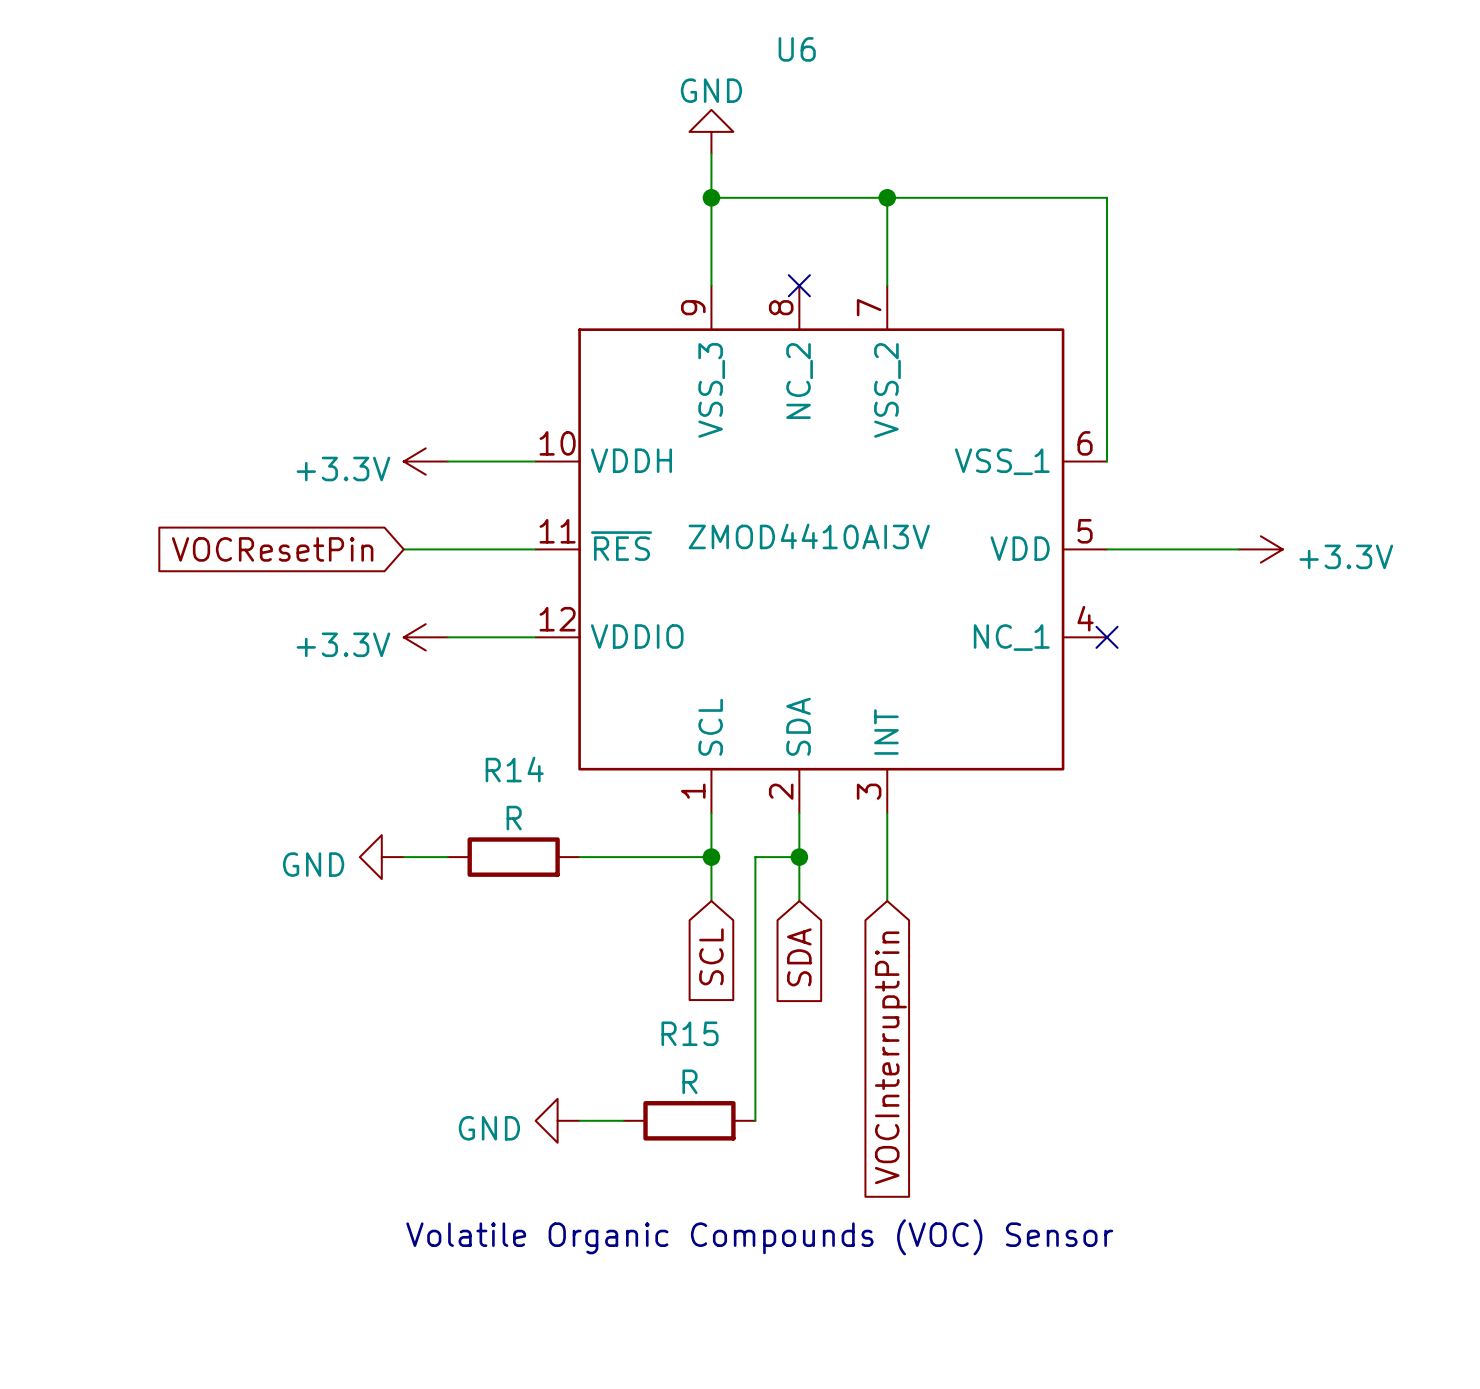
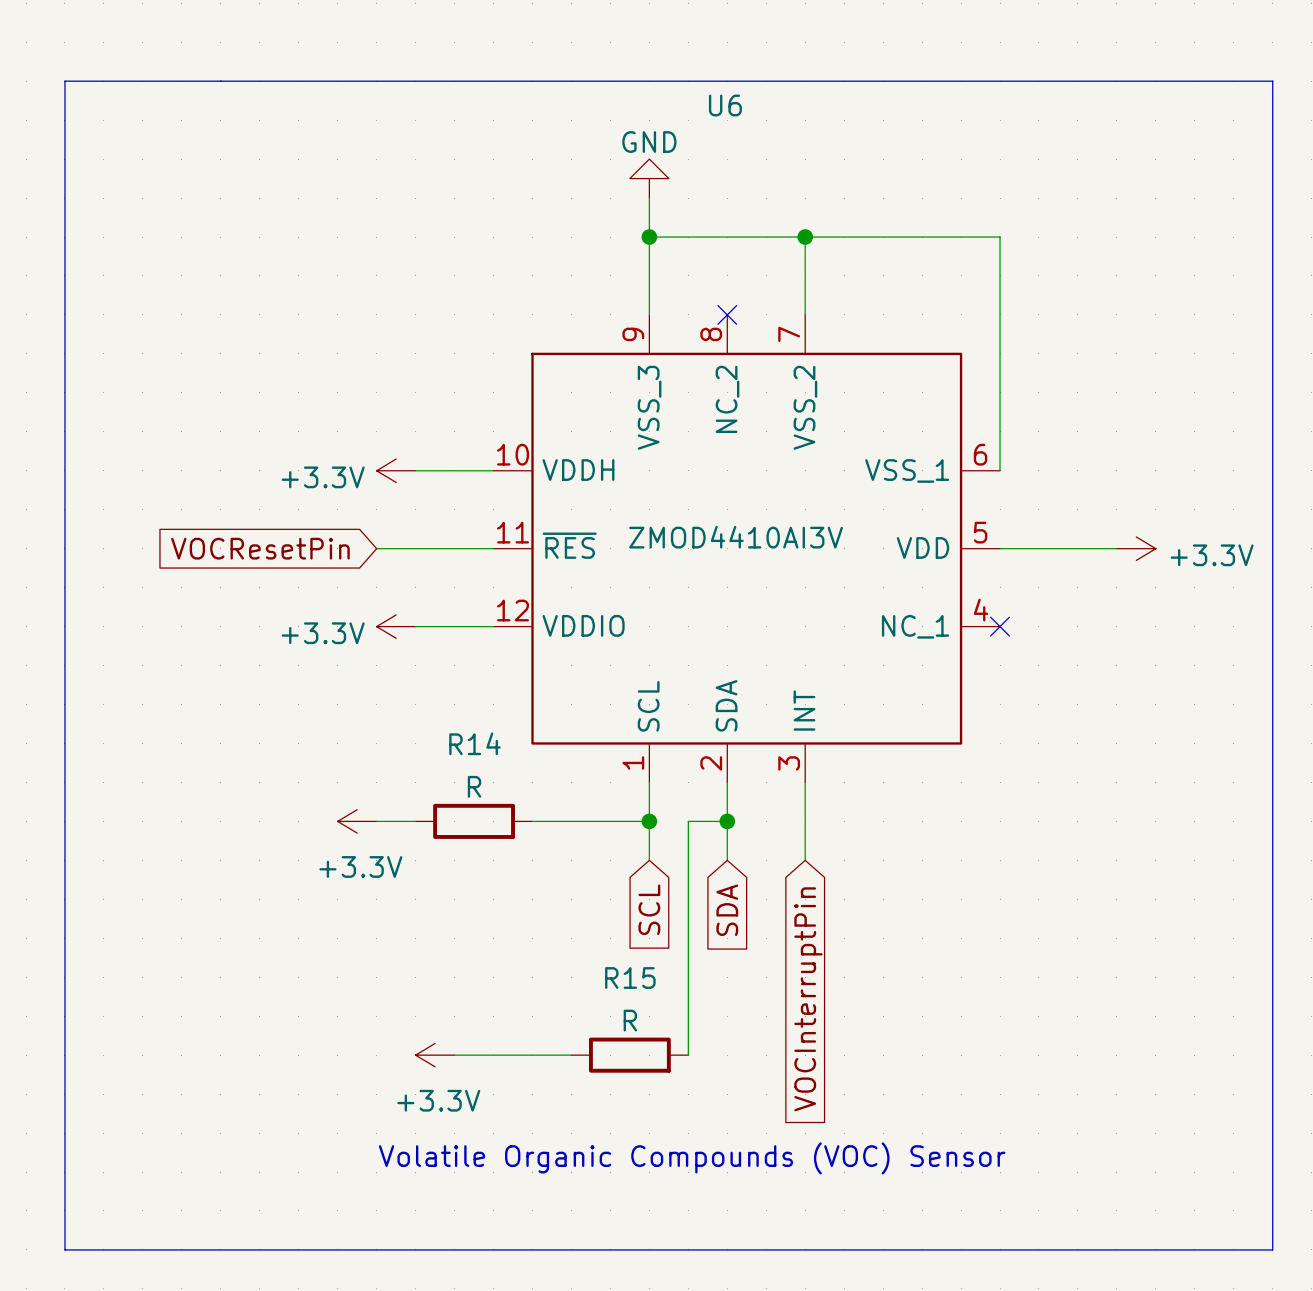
line: none -> (64, 81) (1272, 81) (1272, 1249) (64, 1249) (64, 81)
power symbol: GND (381, 857) -> +3.3V (357, 821)
power symbol: none -> +3.3V (435, 1055)
wire: none -> (454, 1055) (532, 1055)
power symbol: GND (557, 1120) -> none

